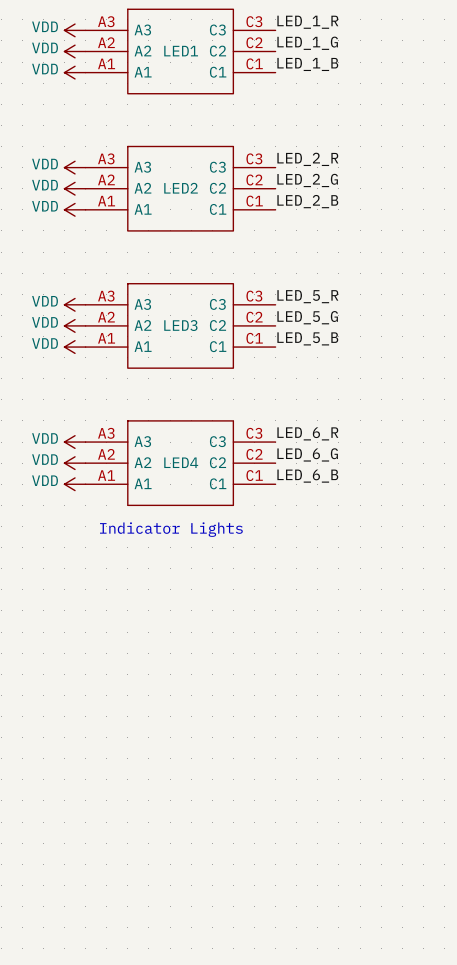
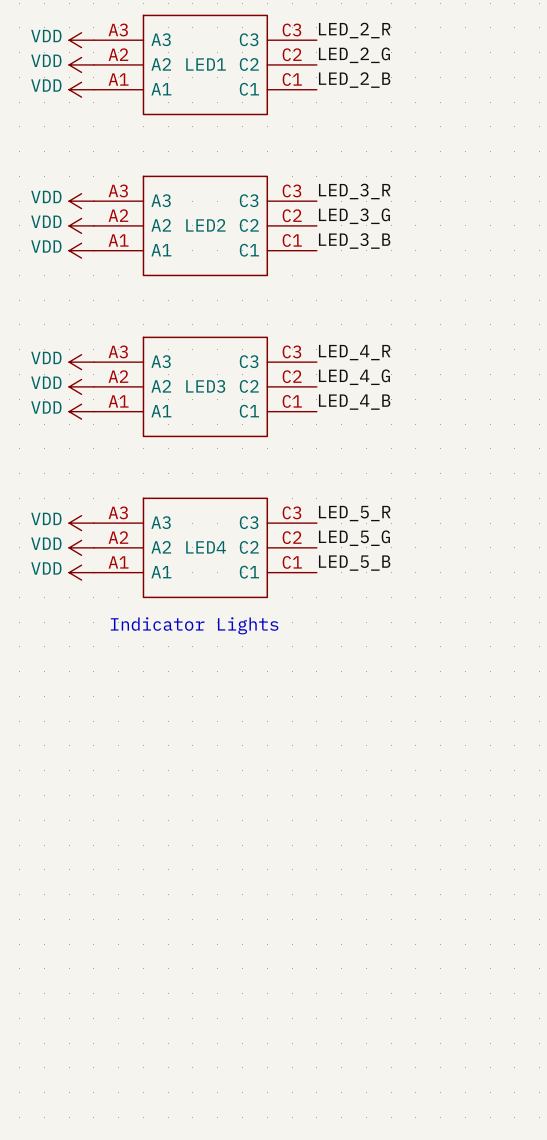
label: LED_1_R (307, 22) -> LED_2_R (354, 30)
label: LED_1_G (307, 43) -> LED_2_G (354, 55)
label: LED_1_B (307, 64) -> LED_2_B (354, 80)
label: LED_2_R (307, 159) -> LED_3_R (354, 191)
label: LED_2_G (307, 180) -> LED_3_G (354, 216)
label: LED_2_B (307, 201) -> LED_3_B (354, 241)
label: LED_5_R (307, 296) -> LED_4_R (354, 352)
label: LED_5_G (307, 317) -> LED_4_G (354, 377)
label: LED_5_B (307, 338) -> LED_4_B (354, 402)
label: LED_6_R (307, 433) -> LED_5_R (354, 513)
label: LED_6_G (307, 454) -> LED_5_G (354, 538)
label: LED_6_B (307, 476) -> LED_5_B (354, 563)

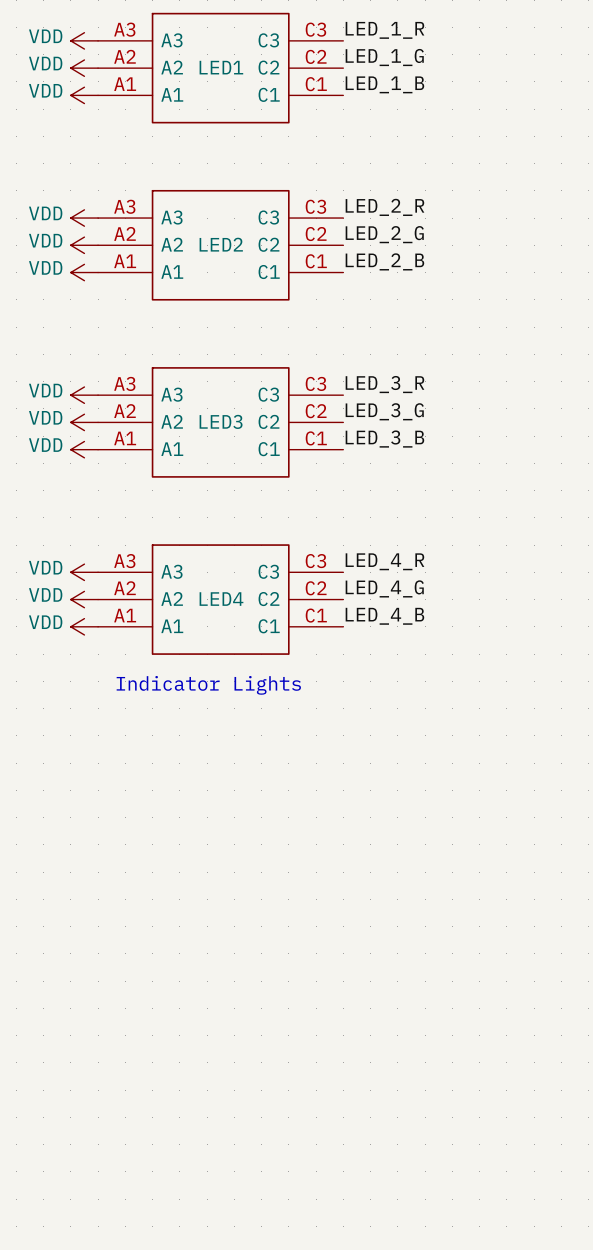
label: LED_2_R (354, 30) -> LED_1_R (384, 30)
label: LED_2_G (354, 55) -> LED_1_G (384, 57)
label: LED_2_B (354, 80) -> LED_1_B (384, 84)
label: LED_3_R (354, 191) -> LED_2_R (384, 207)
label: LED_3_G (354, 216) -> LED_2_G (384, 234)
label: LED_3_B (354, 241) -> LED_2_B (384, 261)
label: LED_4_R (354, 352) -> LED_3_R (384, 384)
label: LED_4_G (354, 377) -> LED_3_G (384, 411)
label: LED_4_B (354, 402) -> LED_3_B (384, 439)
label: LED_5_R (354, 513) -> LED_4_R (384, 561)
label: LED_5_G (354, 538) -> LED_4_G (384, 588)
label: LED_5_B (354, 563) -> LED_4_B (384, 616)

